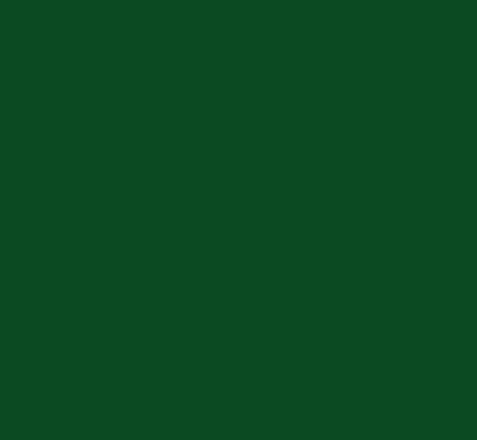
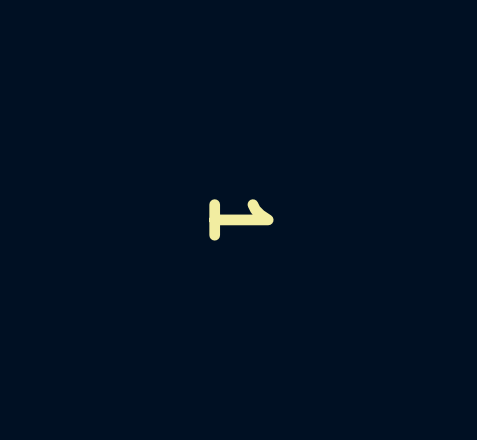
text: none -> 1 (241, 219)

